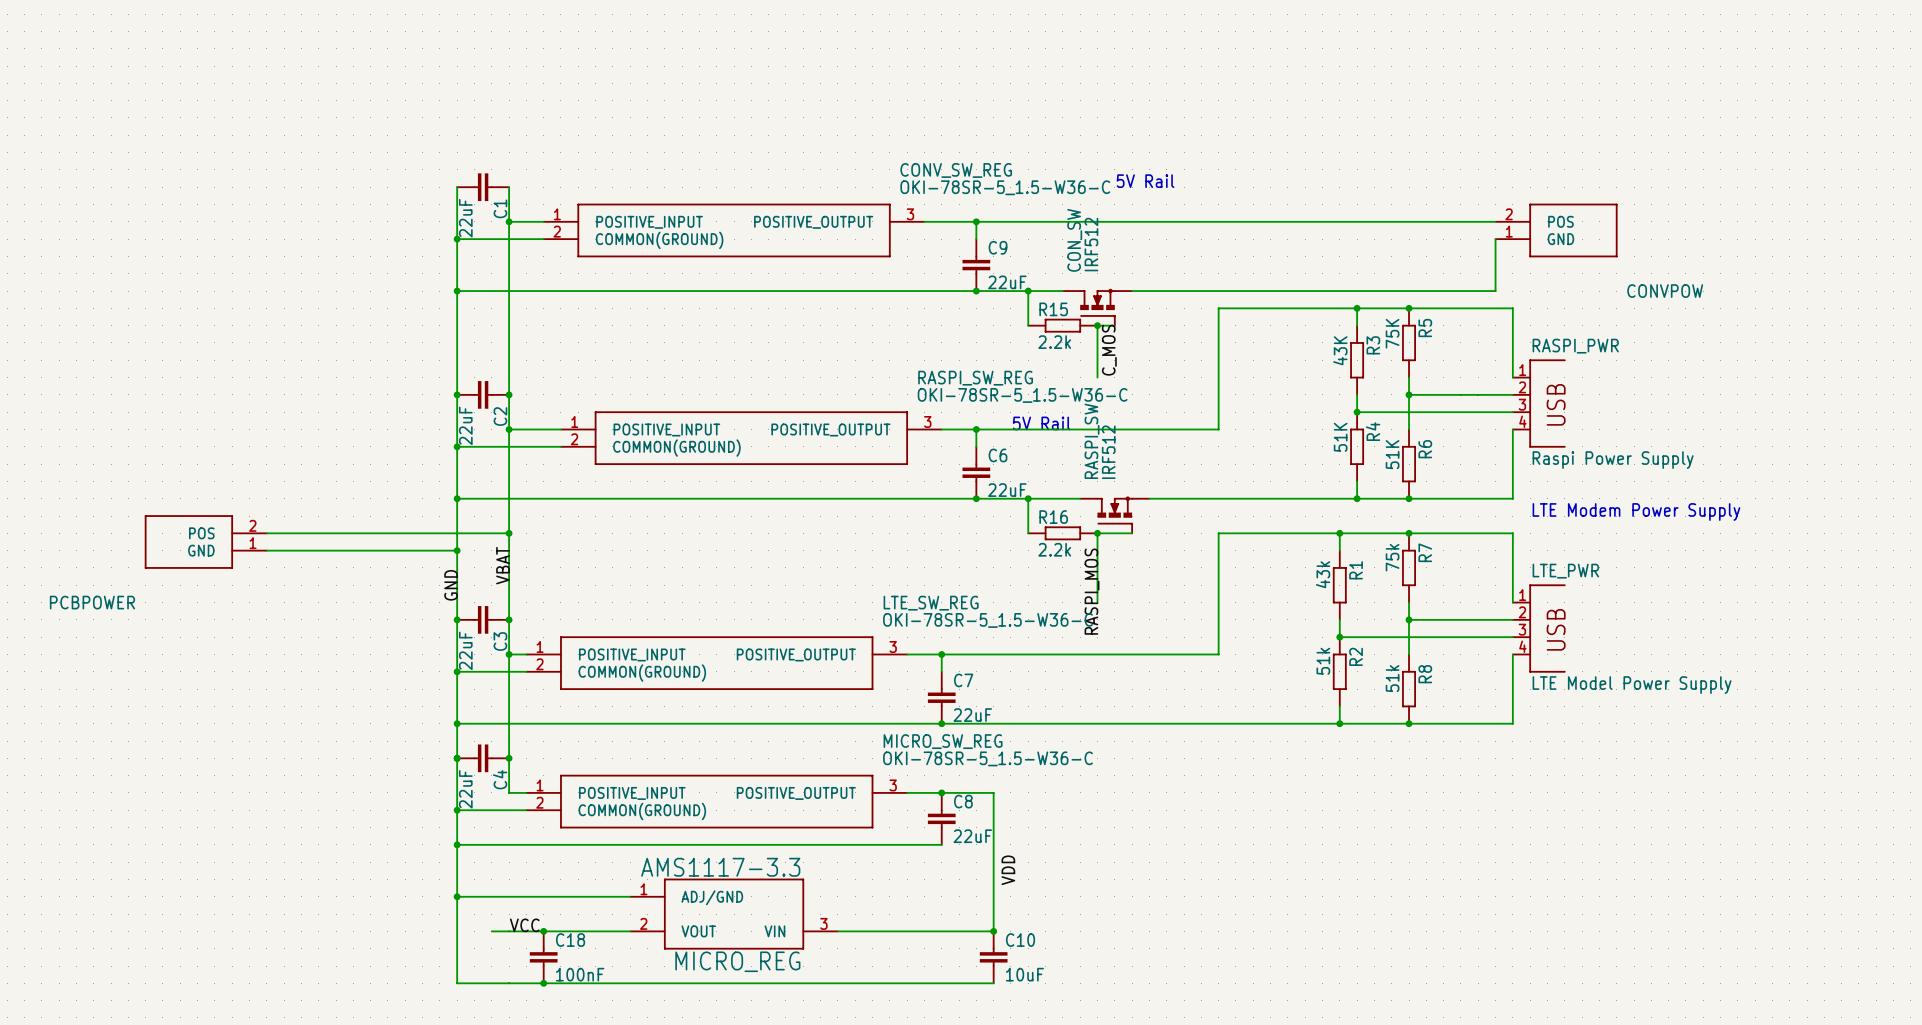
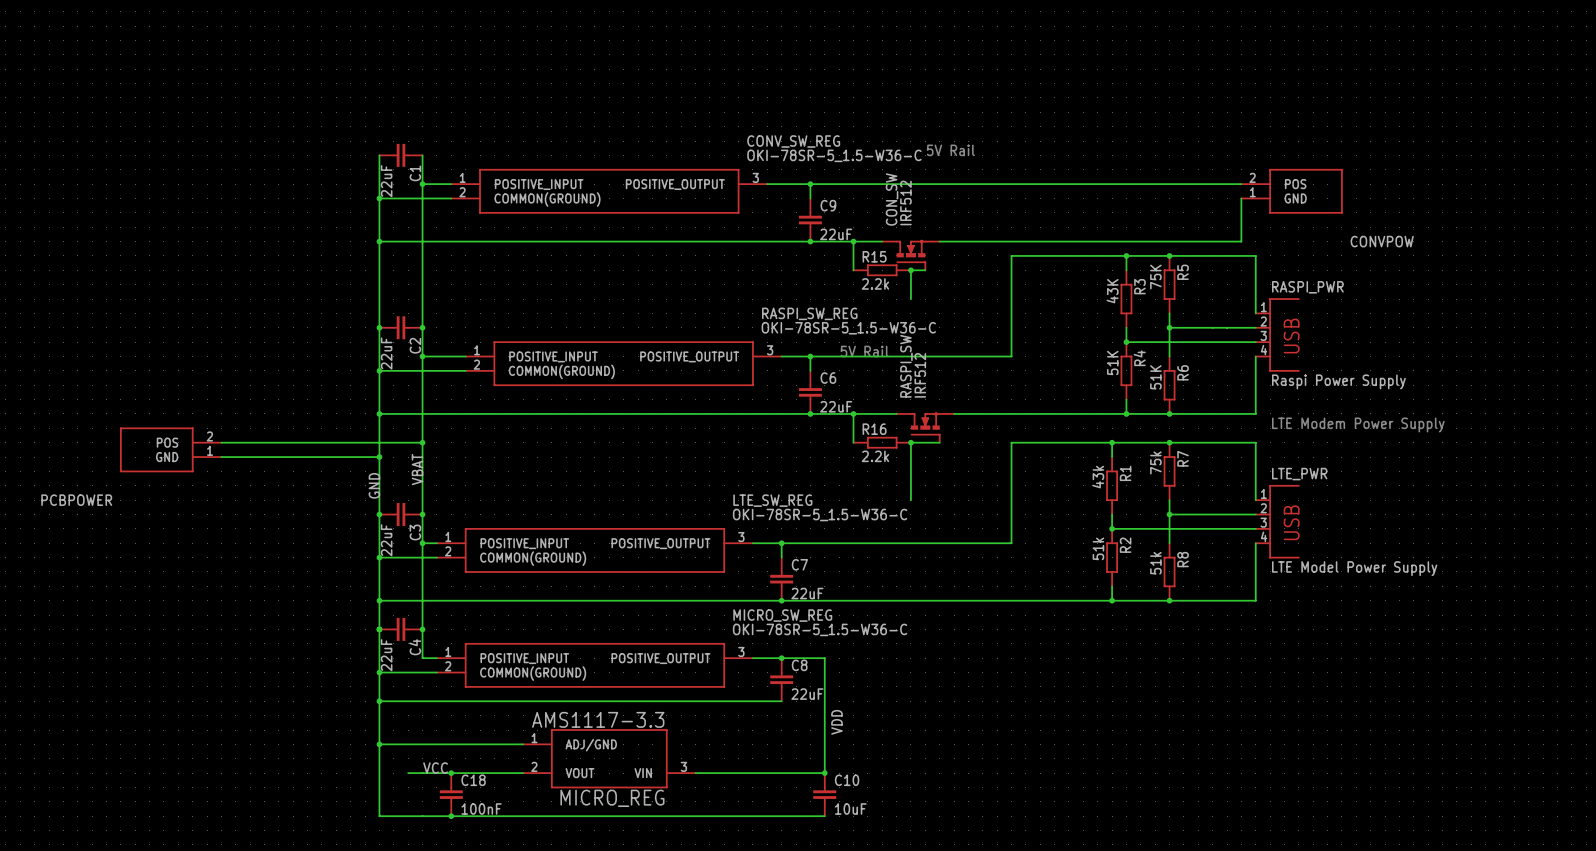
label: C_MOS (1109, 350) -> none
wire: (1097, 360) (1097, 377) -> none
label: RASPI_MOS (1092, 591) -> none

